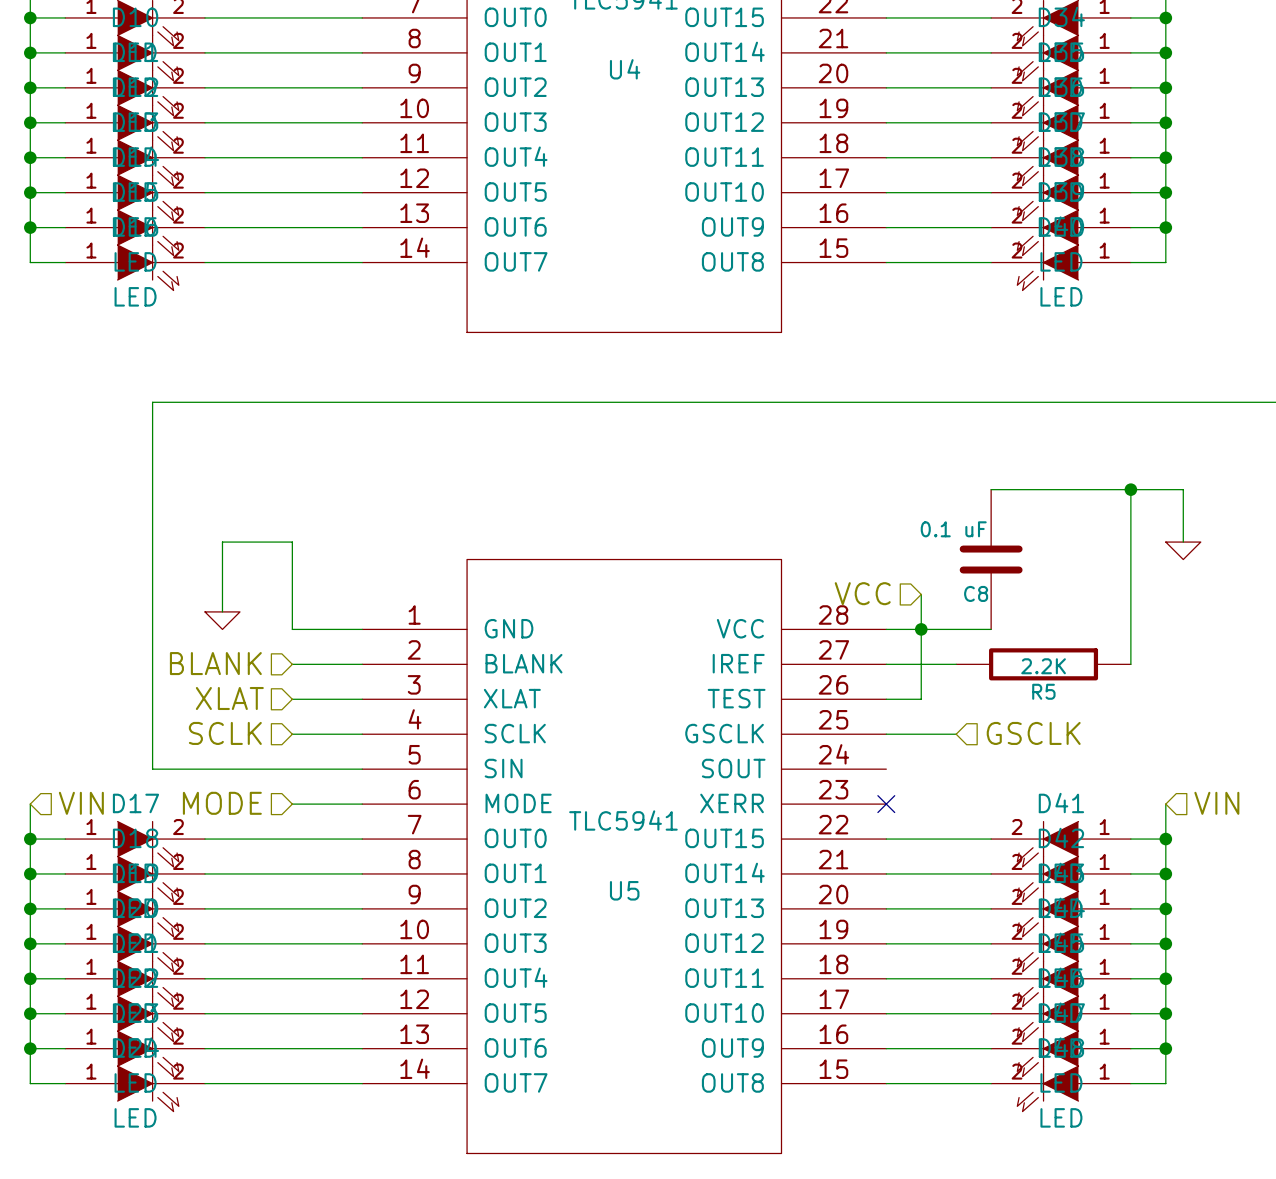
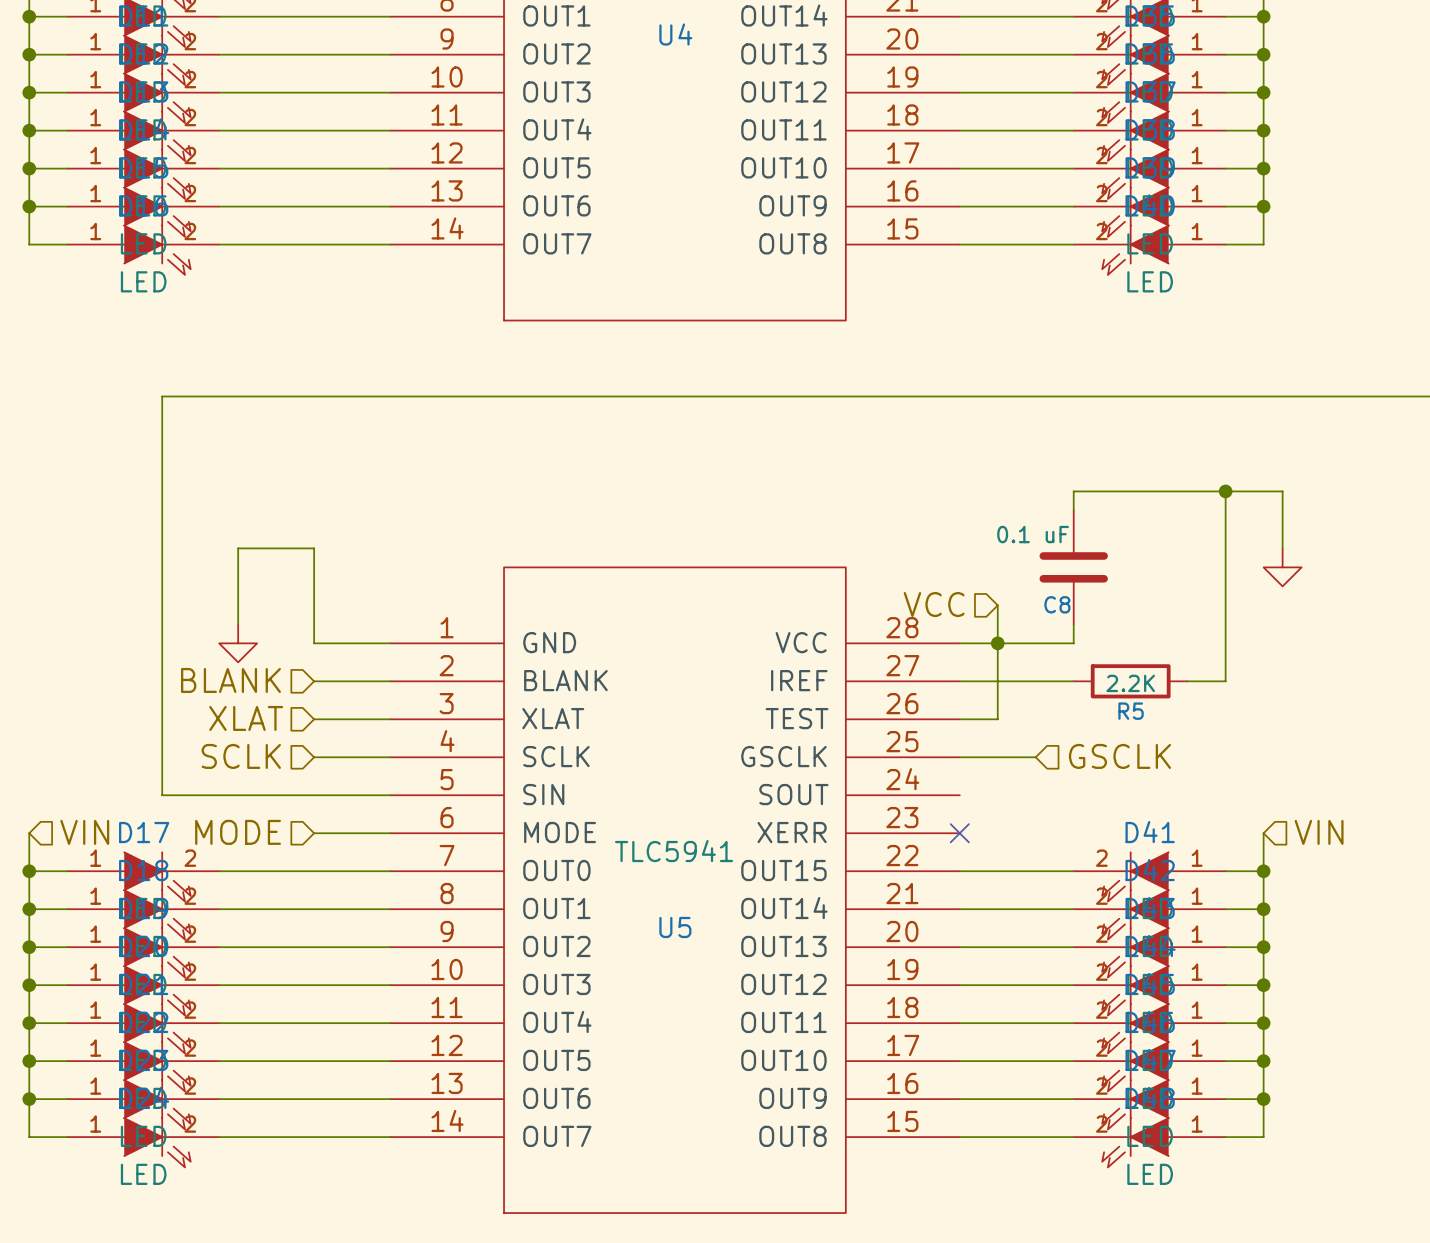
C8 symbol: [959, 489, 1023, 630] -> [1039, 510, 1108, 625]
power symbol shape: [1165, 542, 1201, 560] -> [1263, 548, 1302, 587]
power symbol shape: [205, 611, 240, 630] -> [219, 624, 258, 663]
R5 symbol: [956, 648, 1131, 681] -> [1073, 664, 1188, 699]

